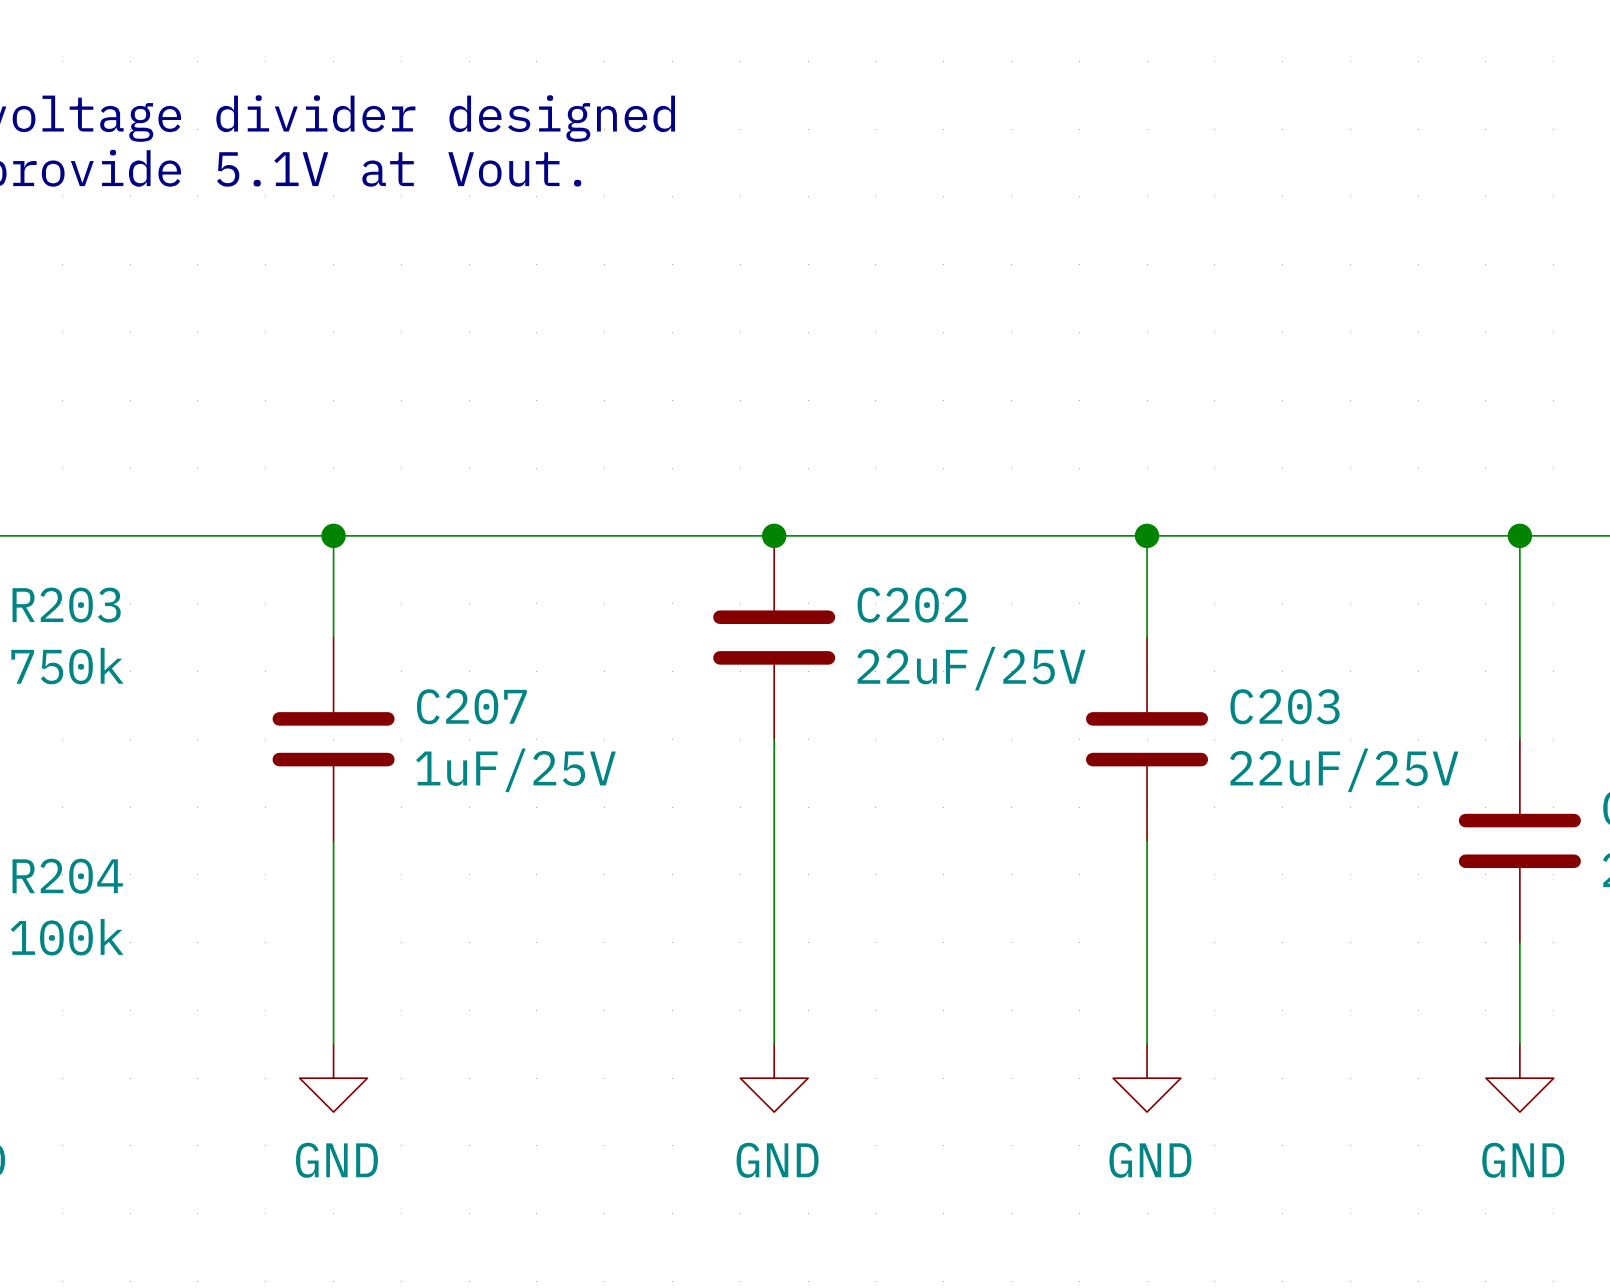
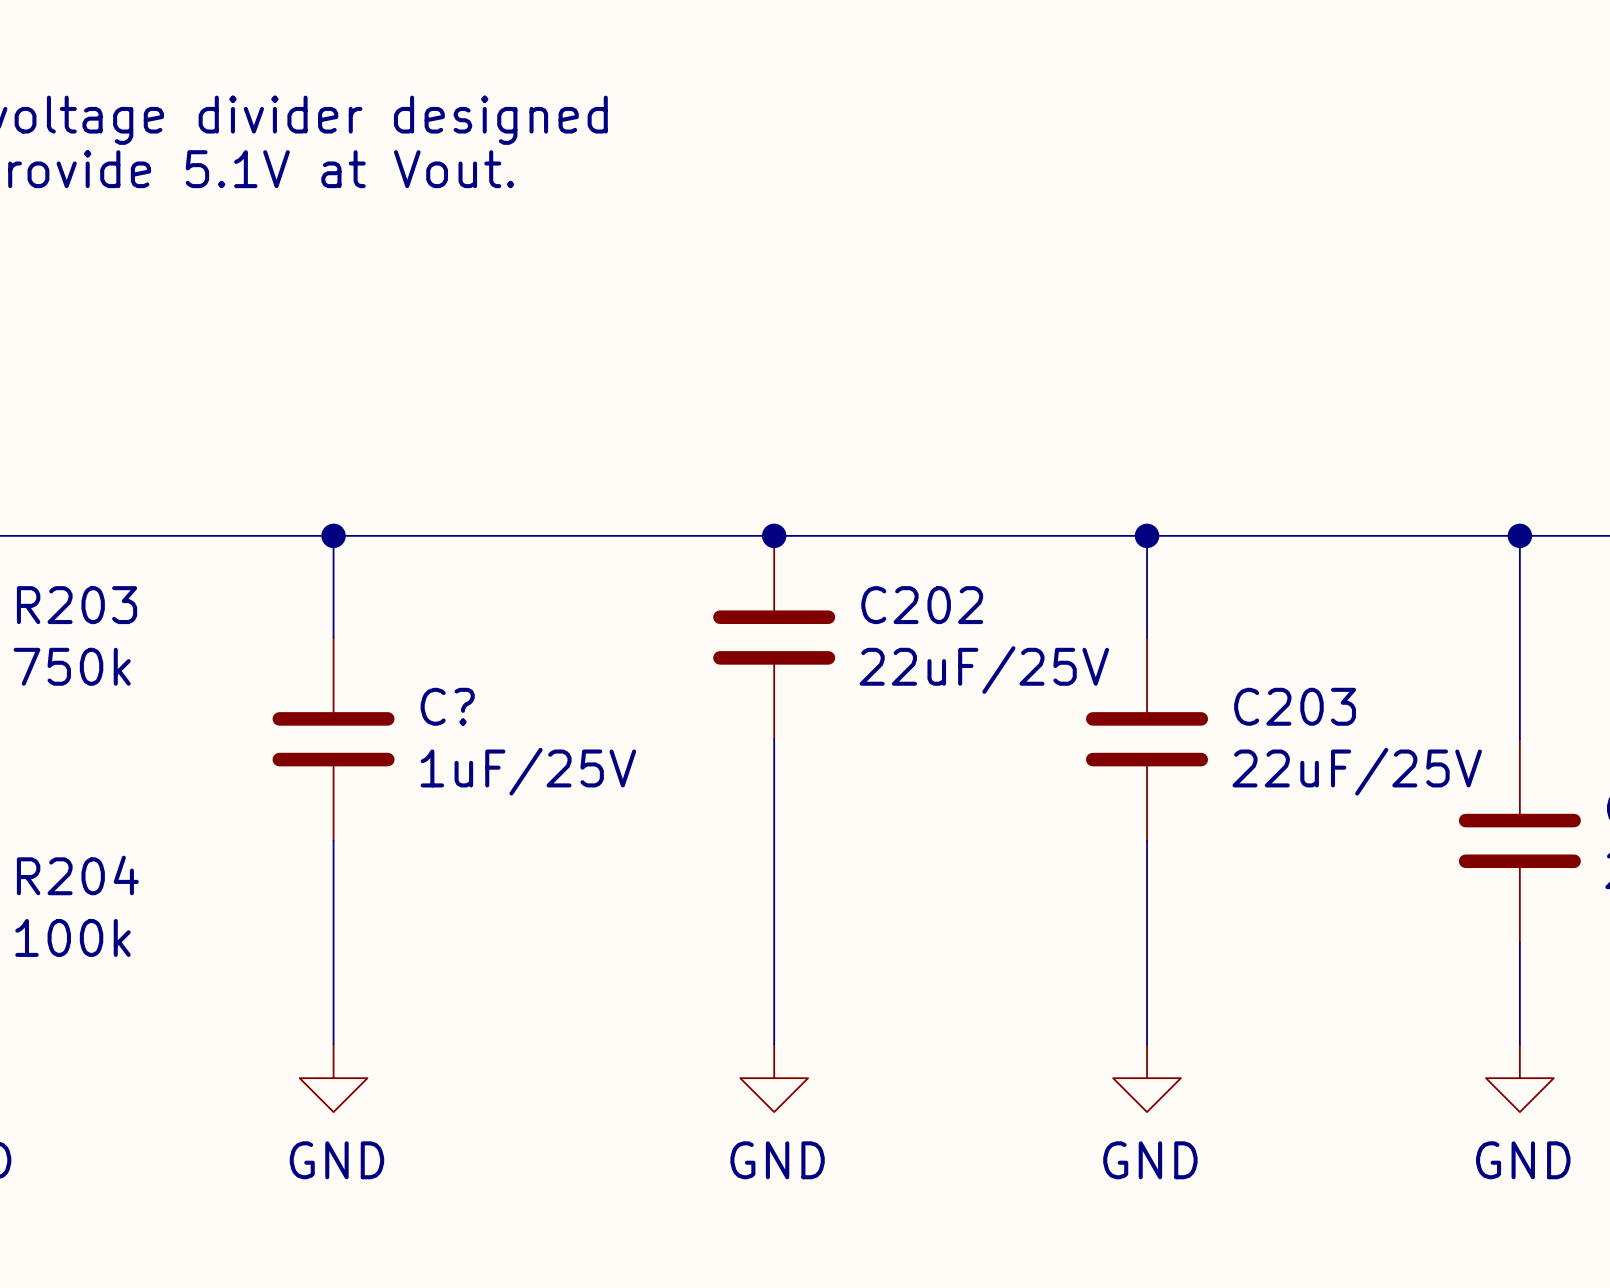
C207 name: C207 (471, 706) -> C? (447, 706)

